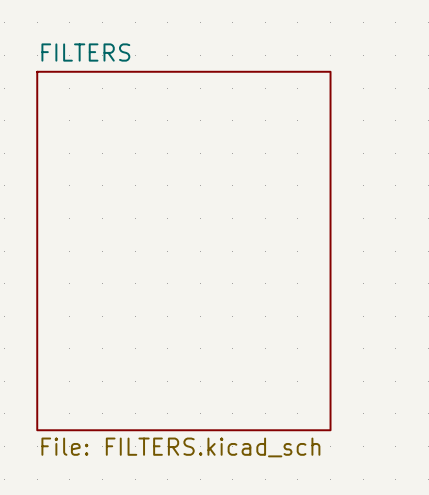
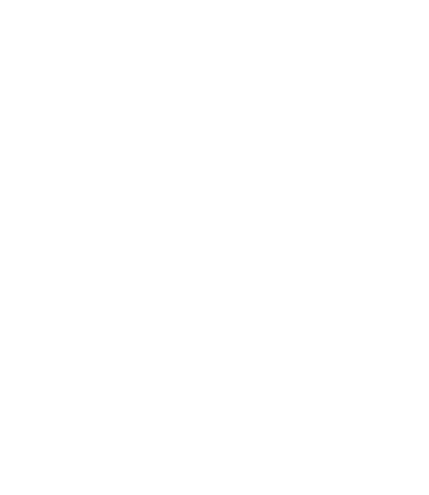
sheet FILTERS: File: FILTERS.kicad_sch (183, 251) -> none

